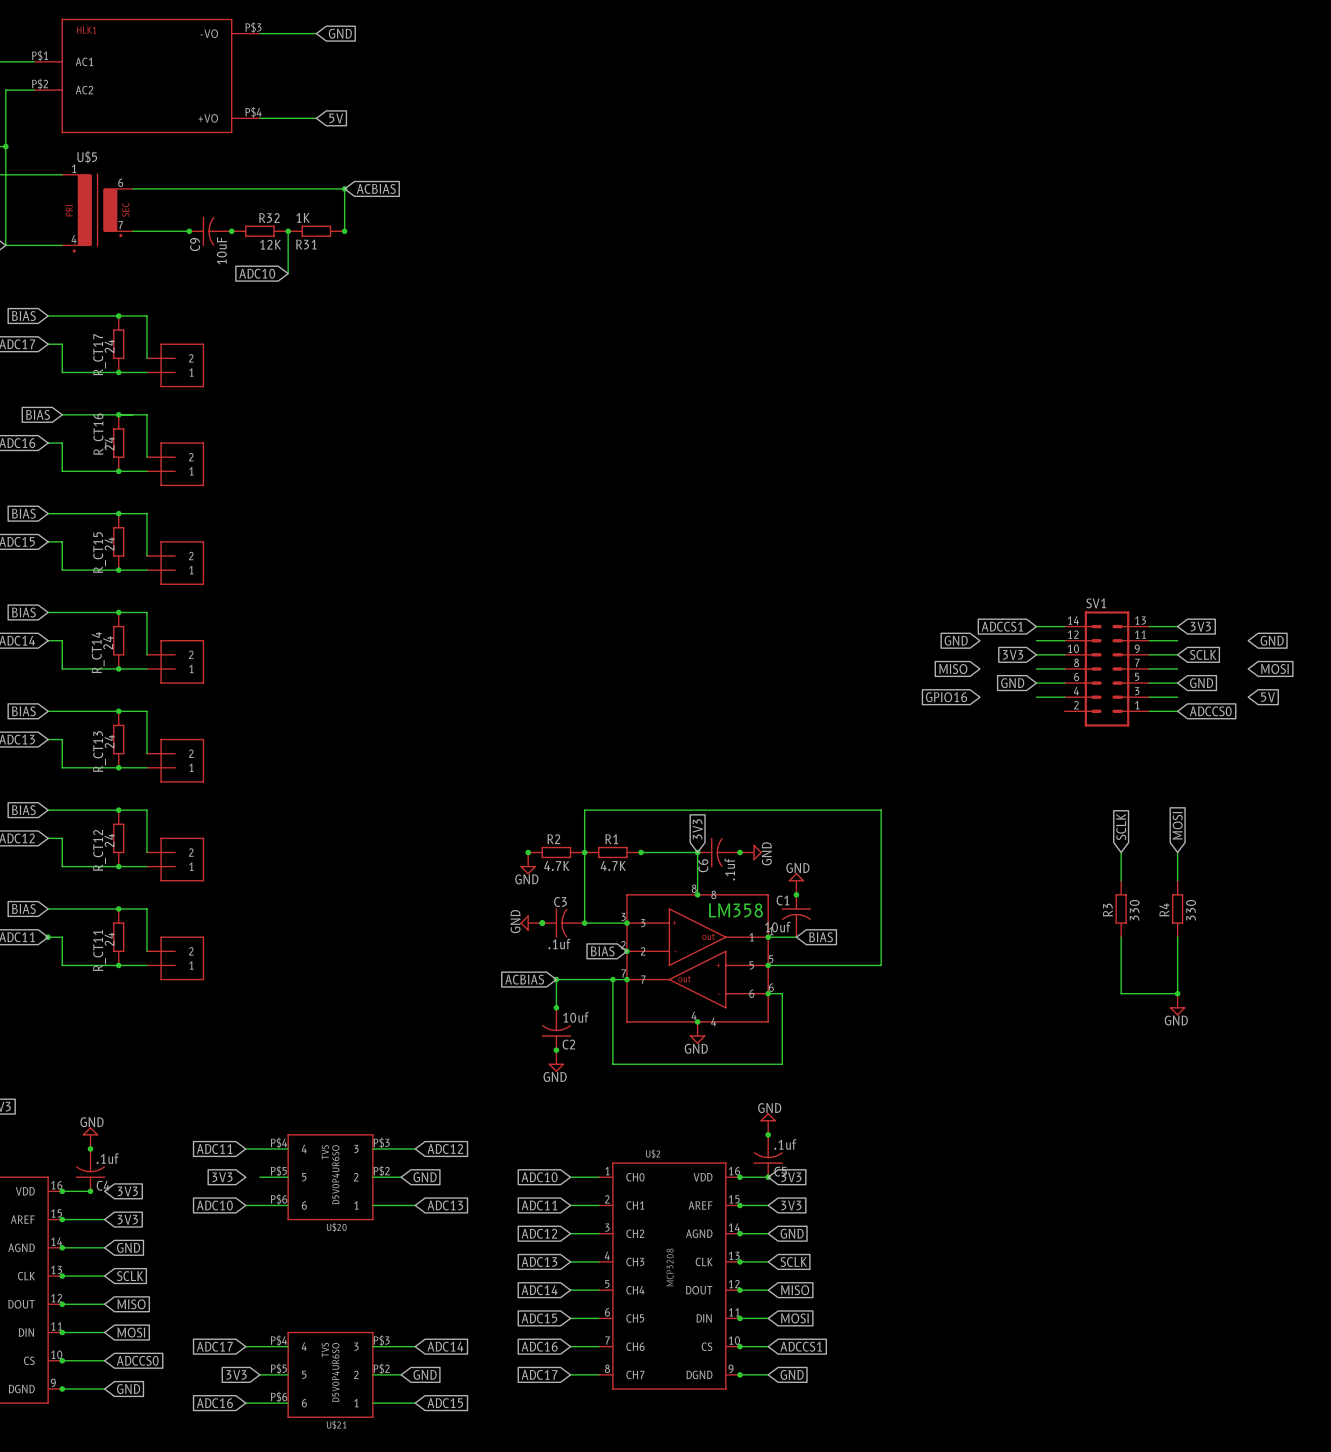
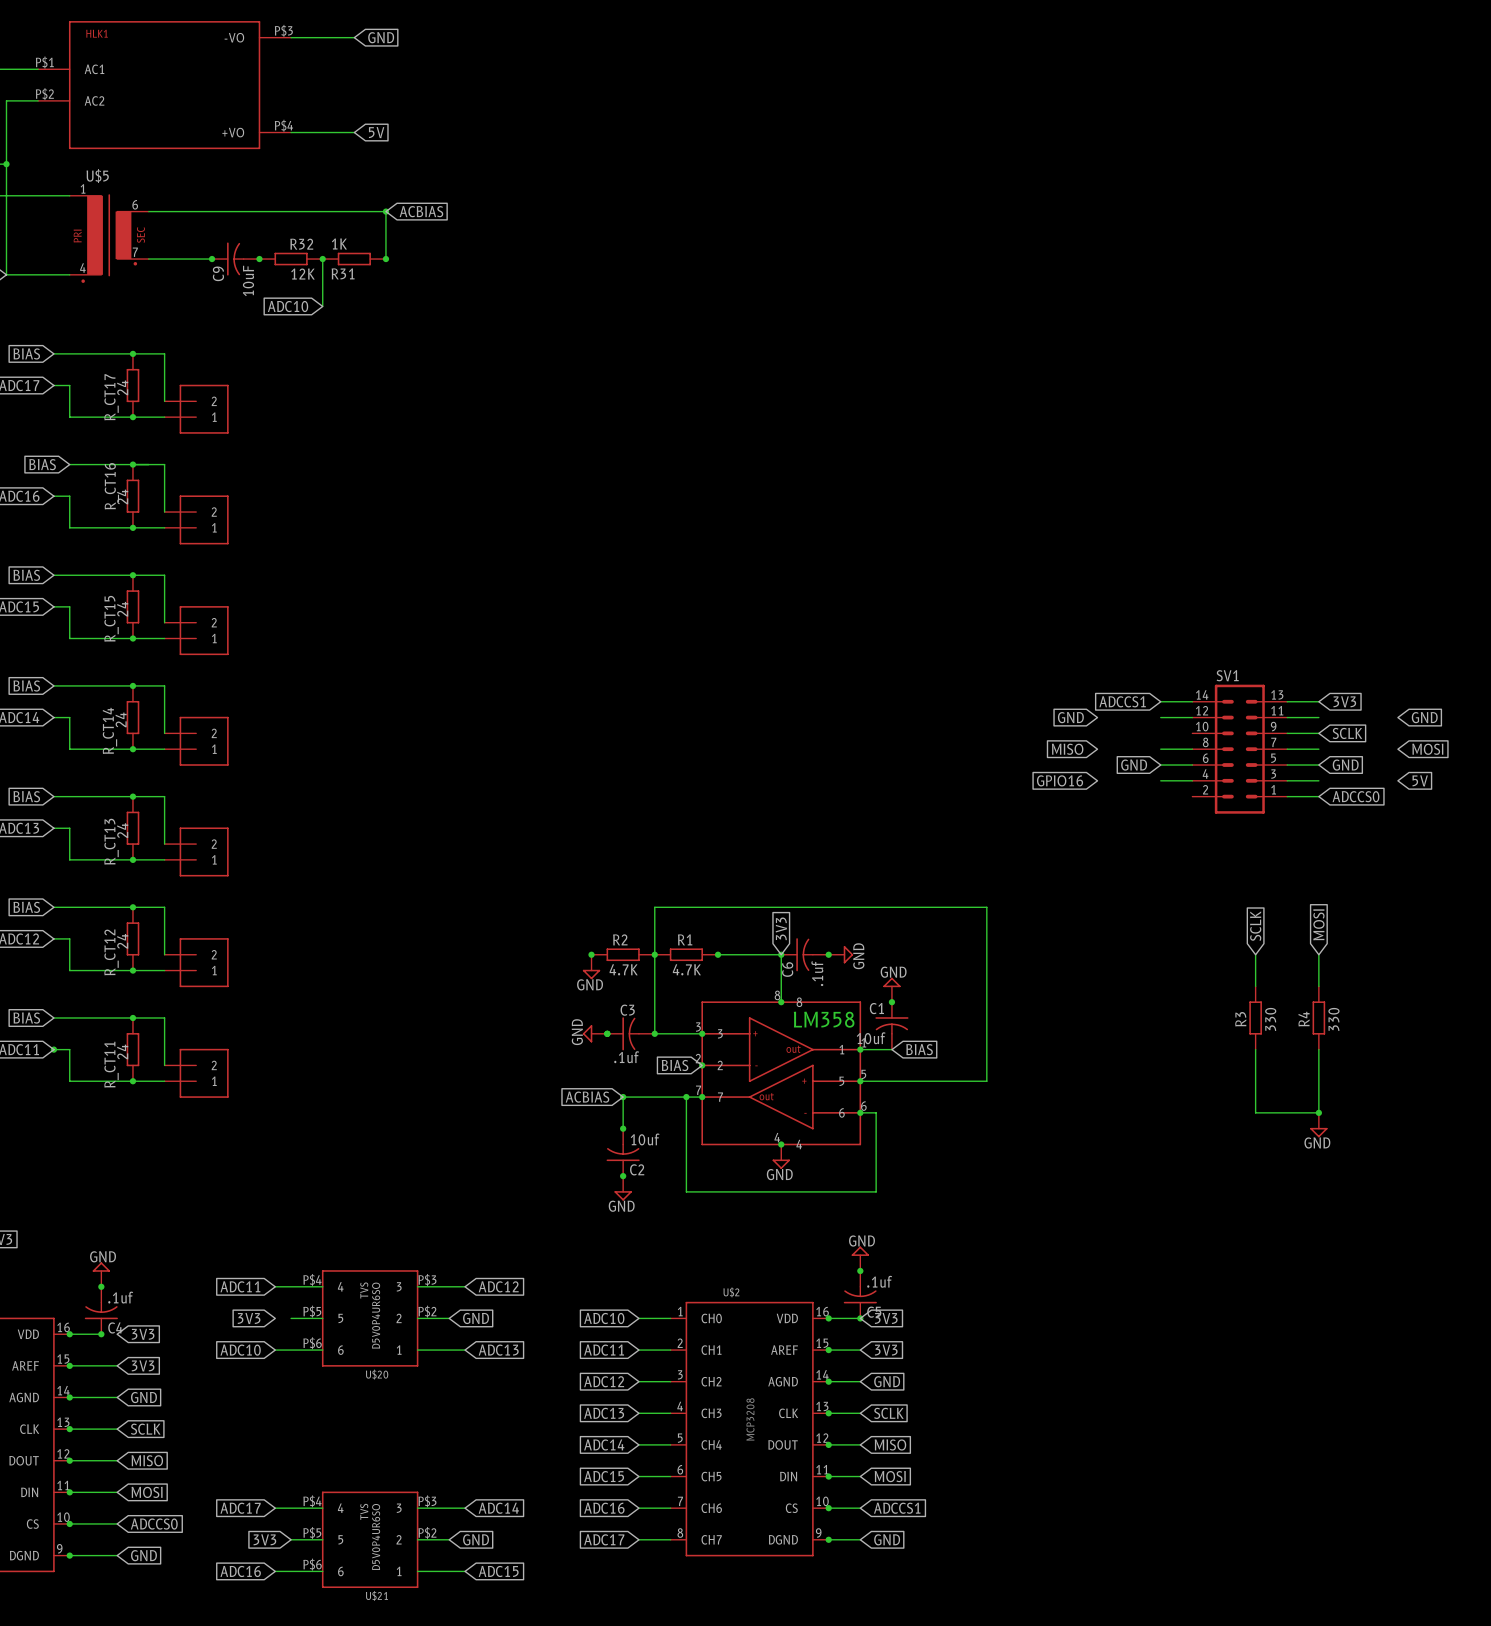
global label: 3V3 (1013, 654) -> none
wire: (1036, 654) (1064, 654) -> none

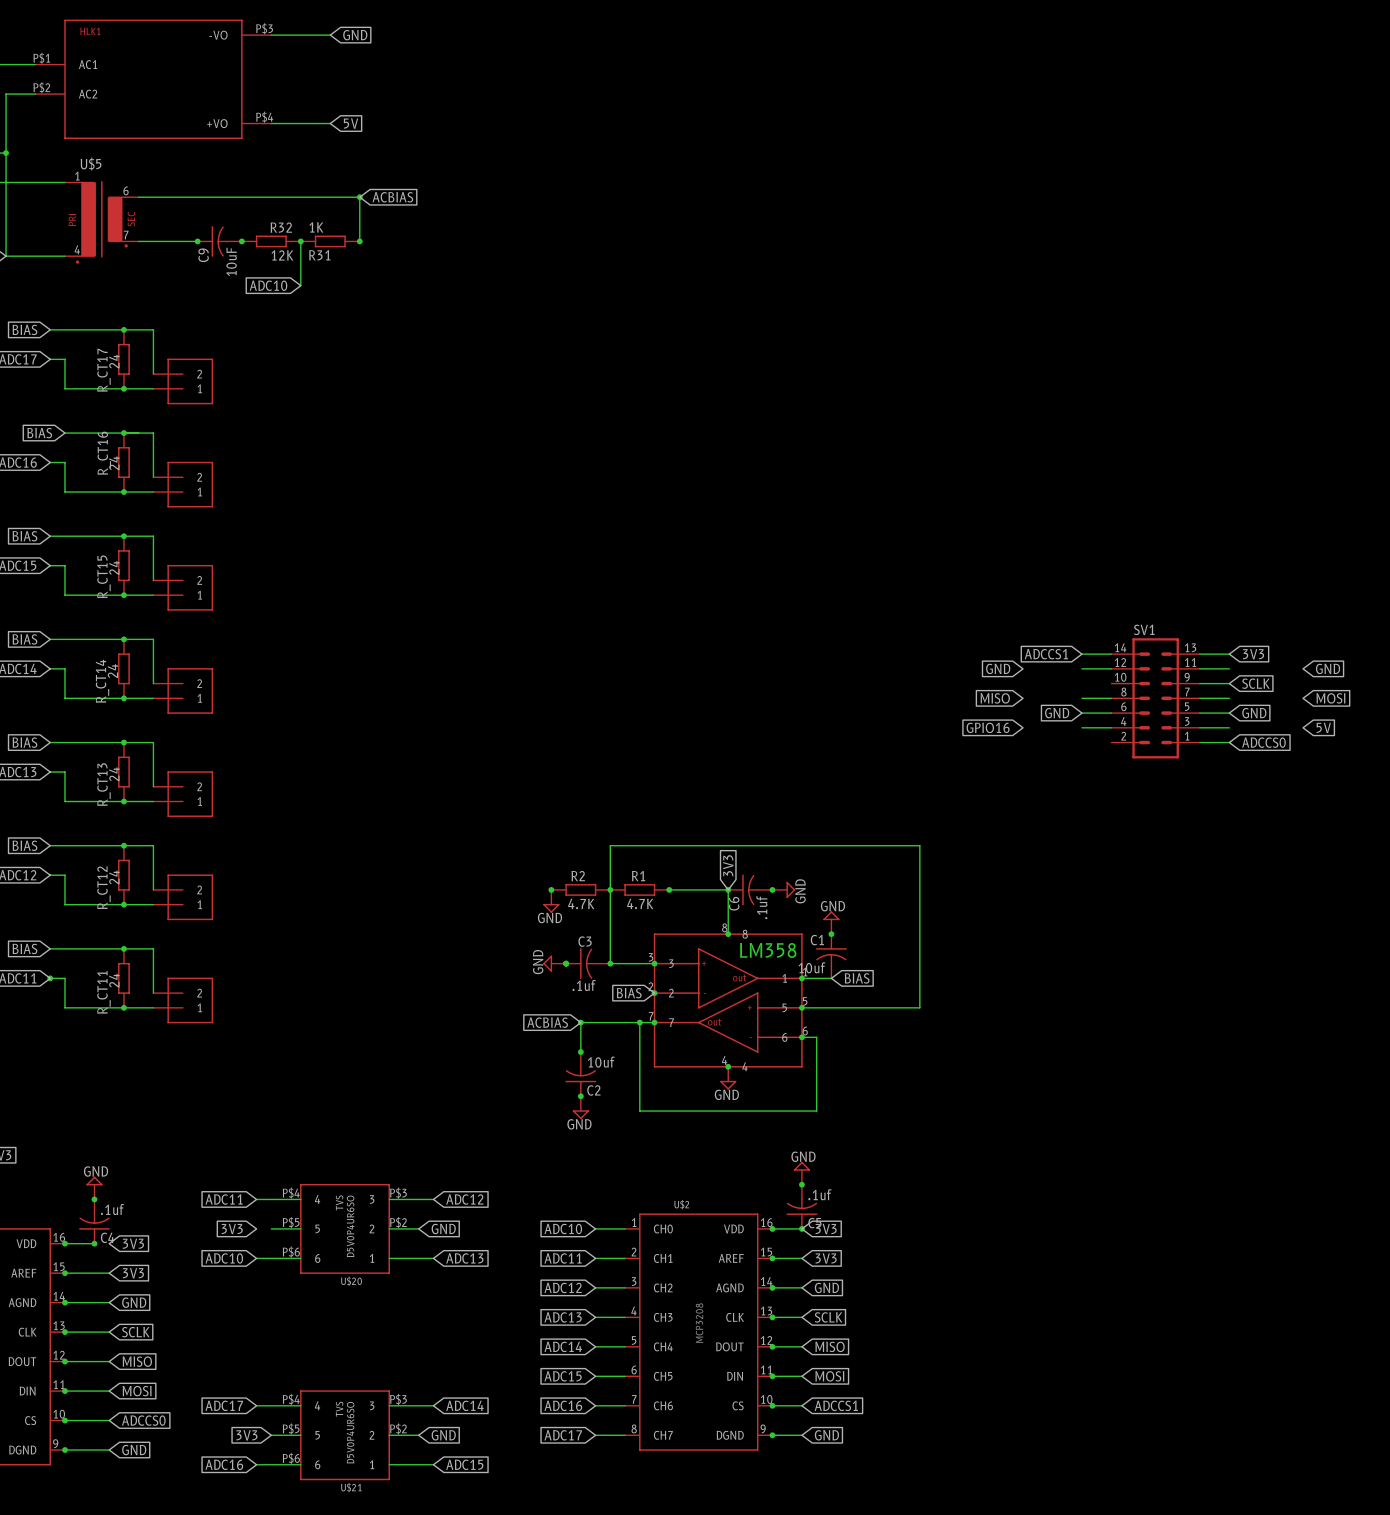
global label: MOSI (1318, 924) -> none
global label: SCLK (1255, 926) -> none
wire: (1255, 954) (1255, 986) -> none
wire: (1318, 954) (1318, 986) -> none
R3: 330 (1255, 1017) -> none
R4: 330 (1318, 1017) -> none
wire: (1255, 1049) (1255, 1112) (1318, 1112) (1318, 1049) -> none
junction: (1318, 1112) -> none
power symbol: GND (1318, 1125) -> none

